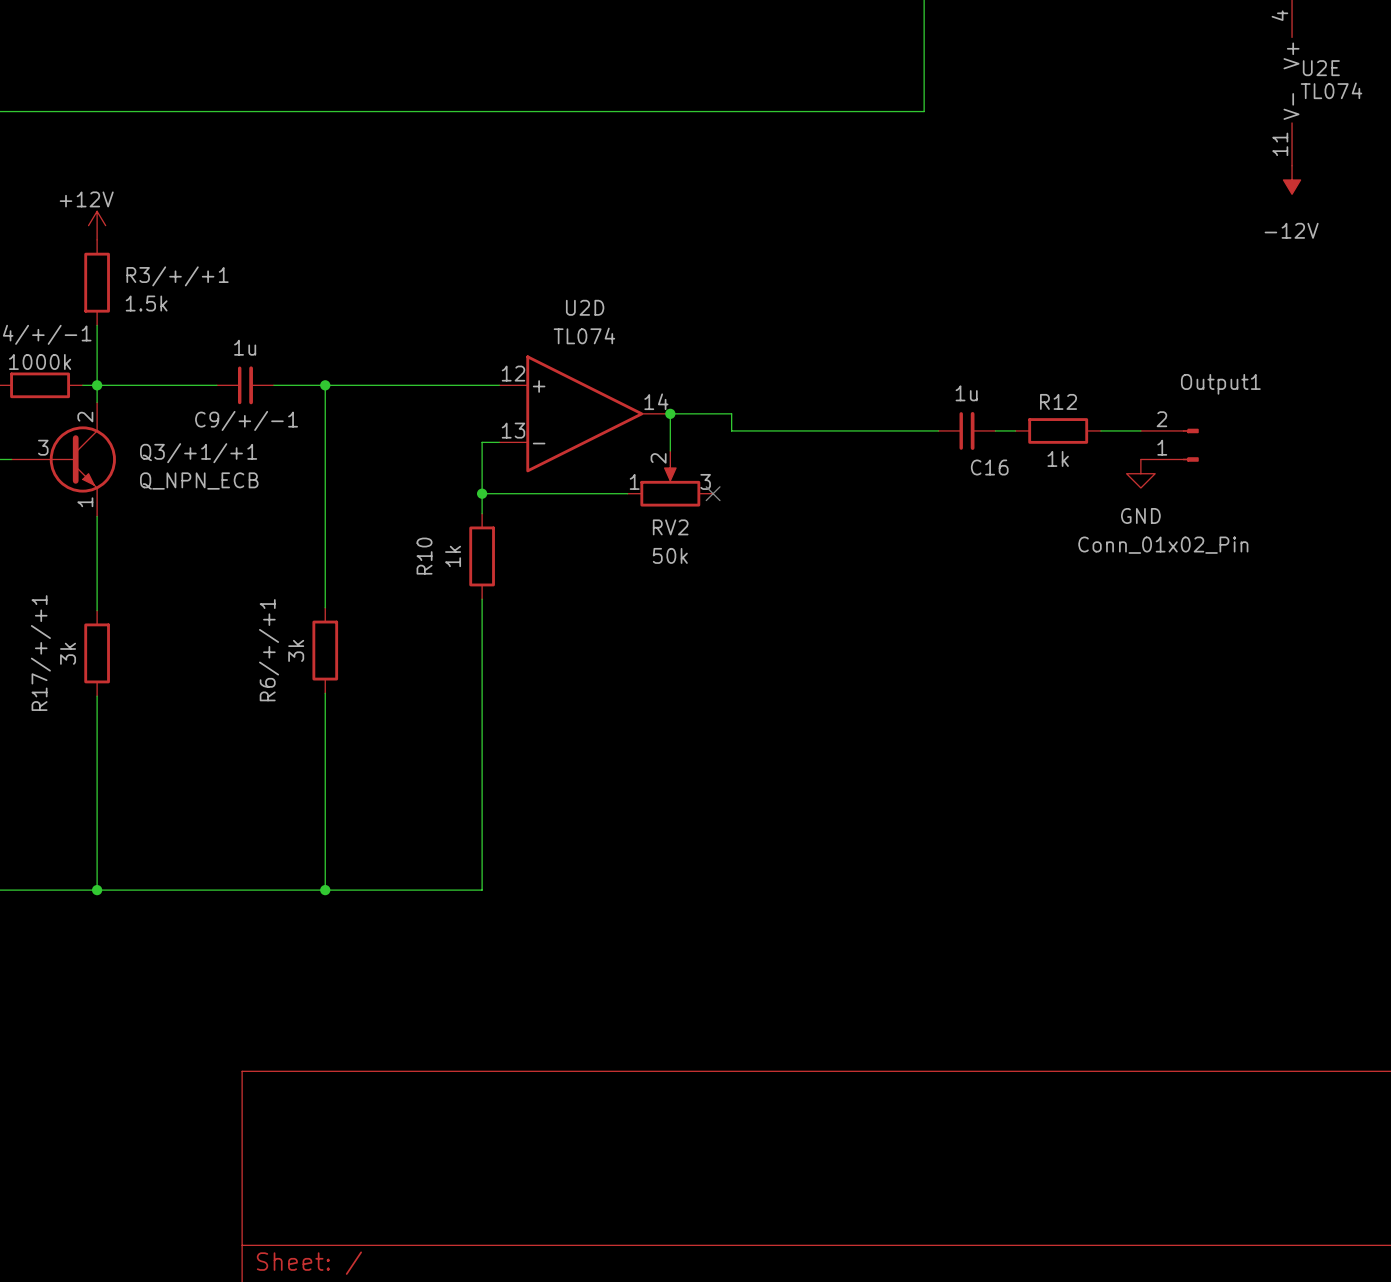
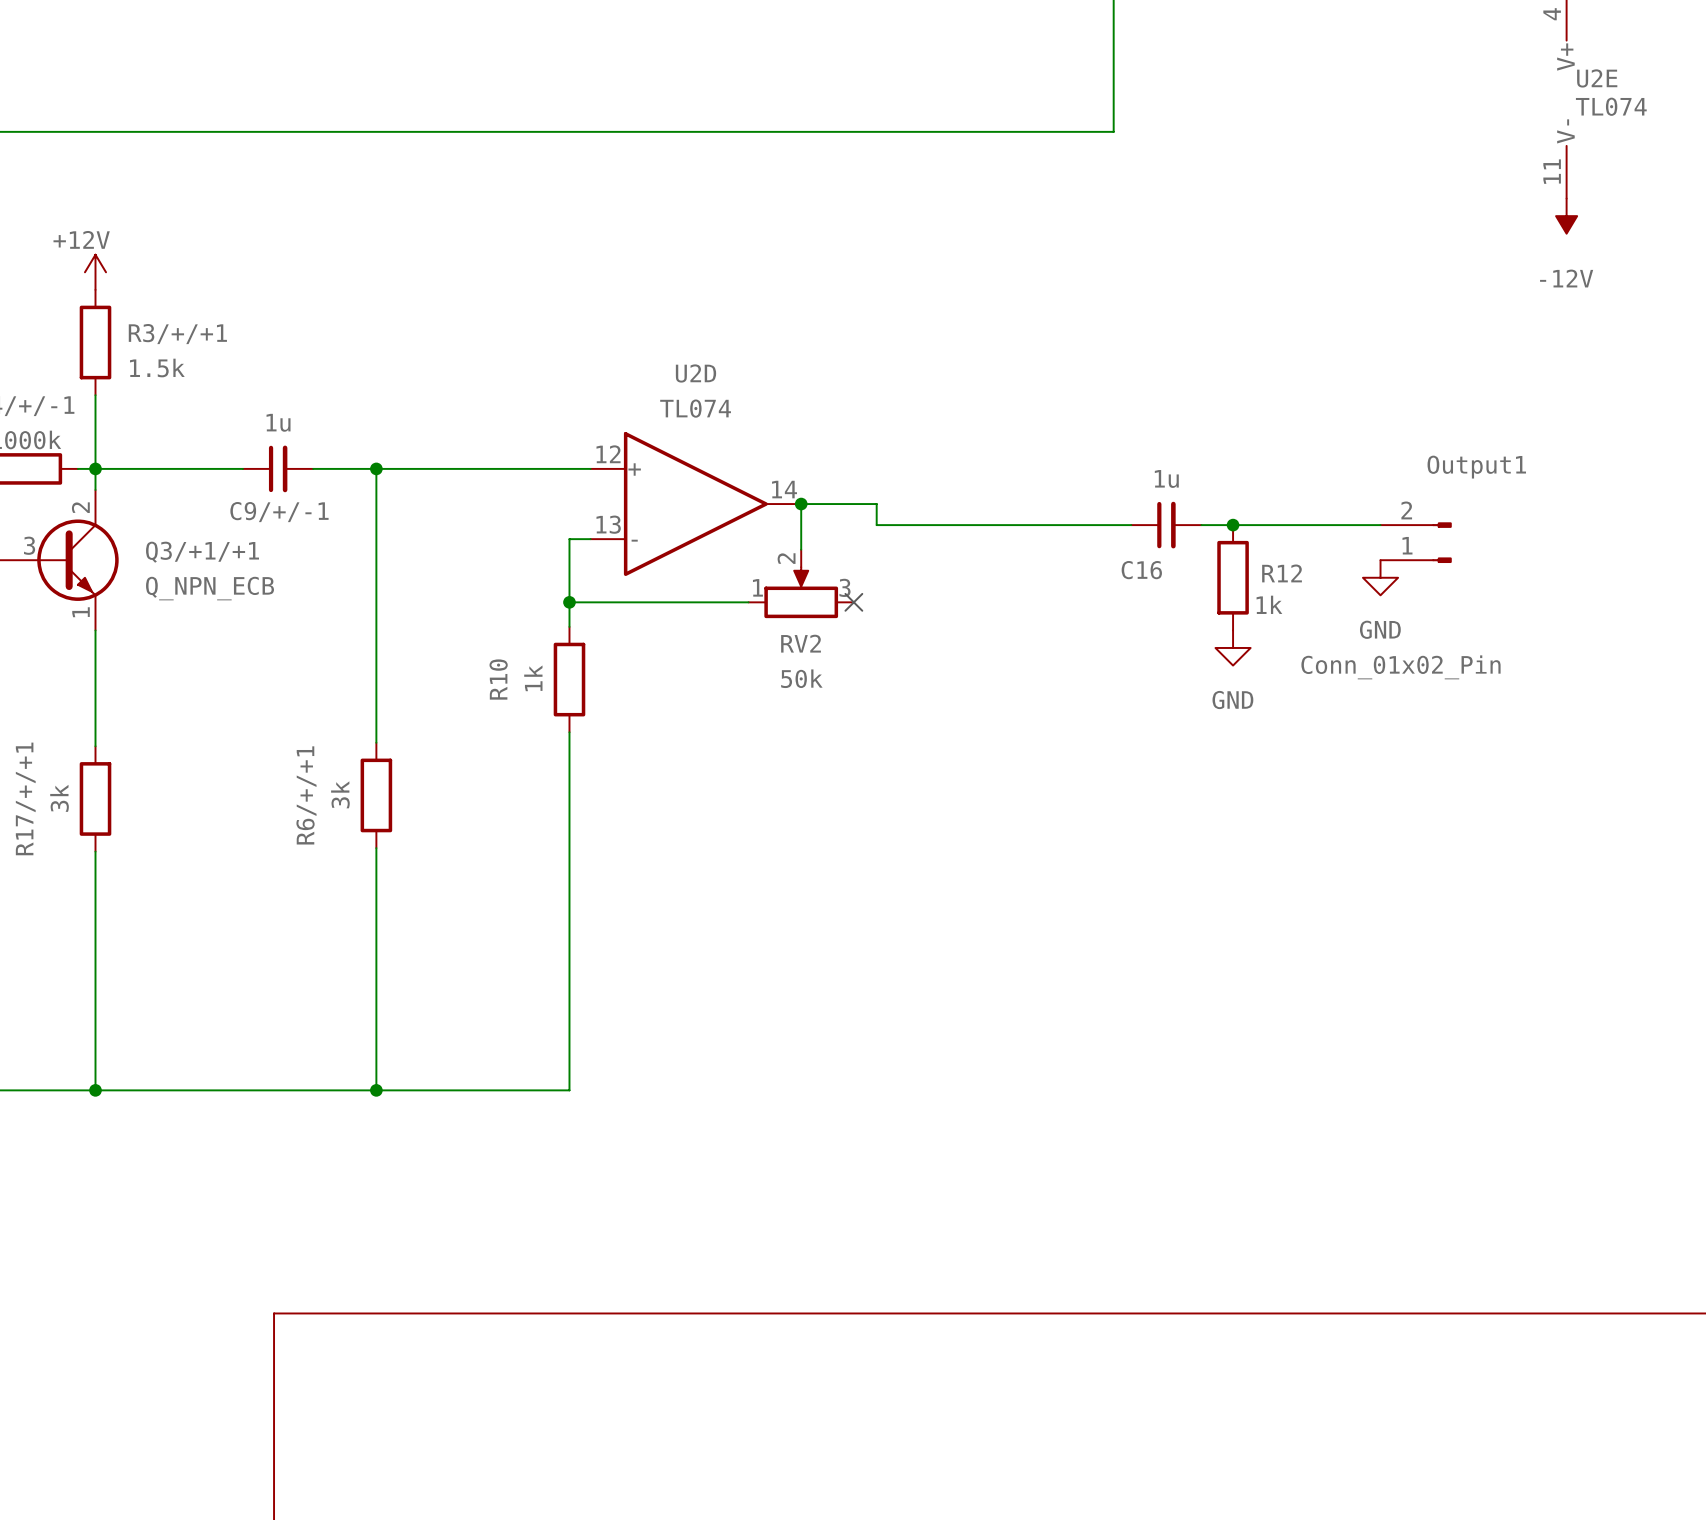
wire: none -> (1226, 525) (1331, 525)
junction: none -> (1233, 525)
R12 rotation: 0° (1058, 430) -> 90° clockwise (1233, 577)
R12 position: (1058, 430) -> (1233, 577)
R12 value position: 1k (1058, 458) -> 1k (1269, 604)
C16 name position: C16 (989, 467) -> C16 (1141, 570)
power symbol: none -> GND (1233, 647)

